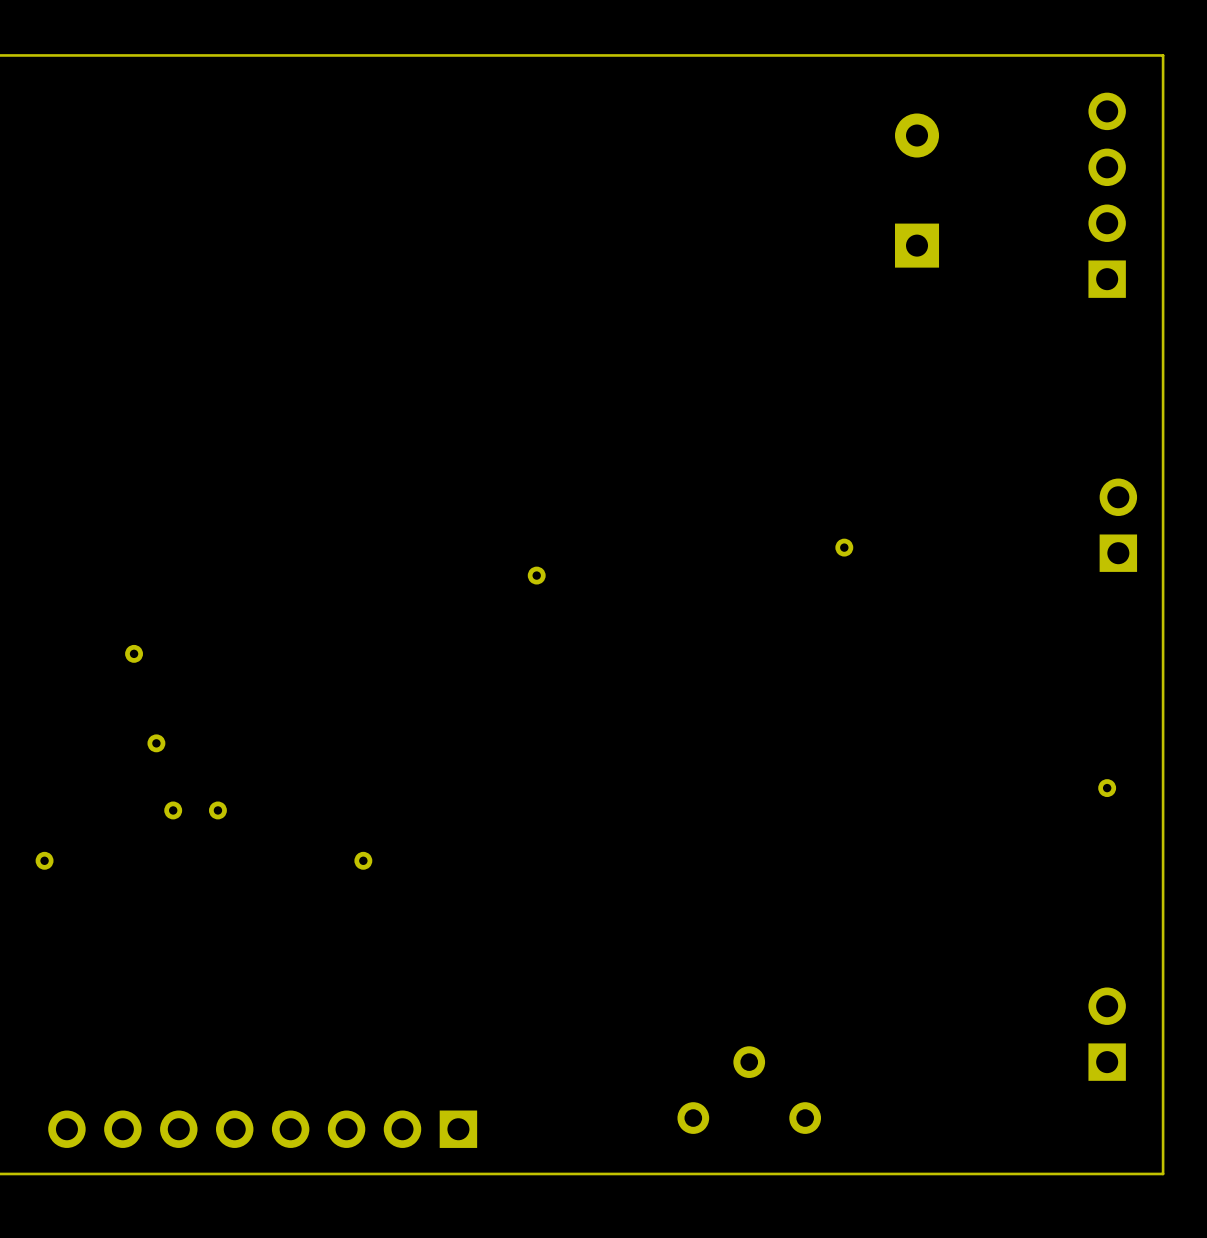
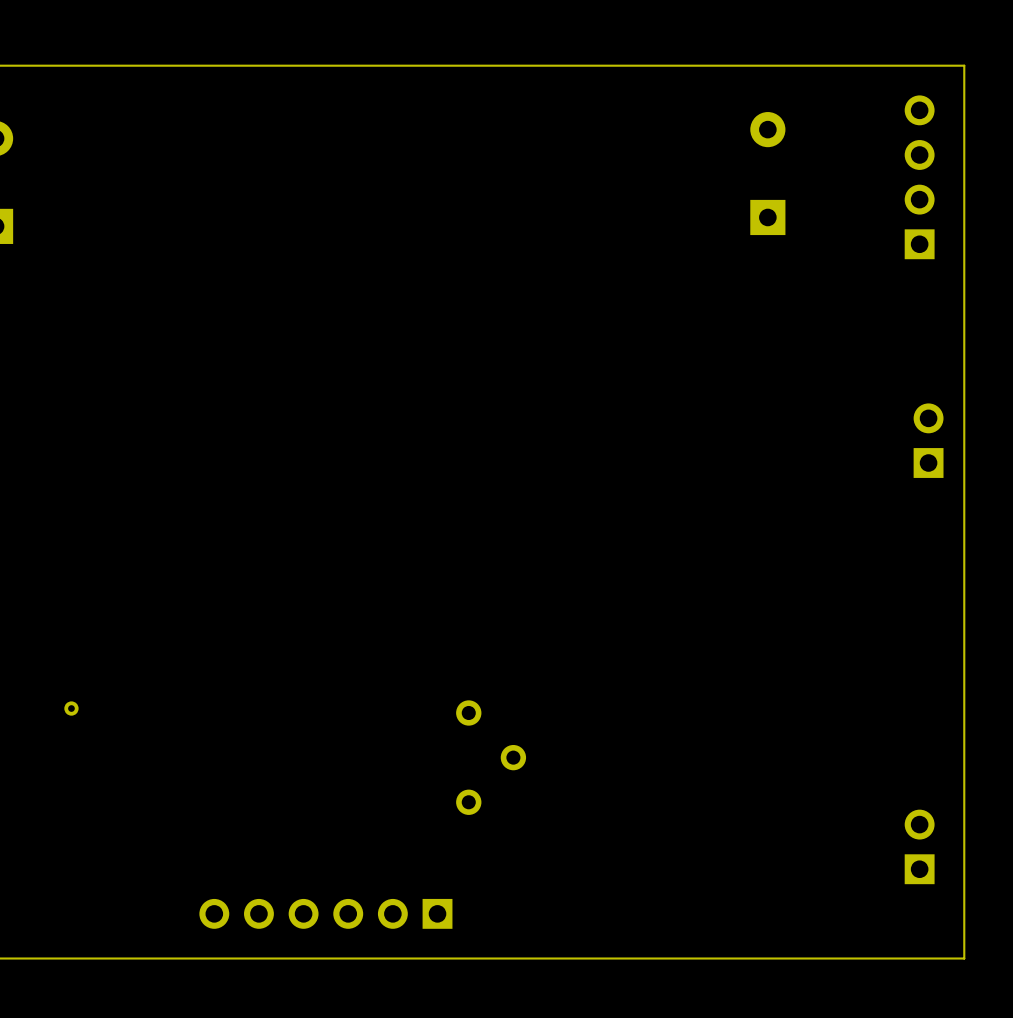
part: (844, 547) -> none
part: (536, 575) -> none
part: (134, 653) -> none
part: (156, 743) -> none
part: (1107, 788) -> none
part: (173, 810) -> none
part: (217, 810) -> none
part: (363, 860) -> none
part rotation: 0° (749, 1090) -> 90° clockwise (491, 757)
part position: (749, 1090) -> (491, 757)
part: none -> (325, 913)
part: (262, 1129) -> none

